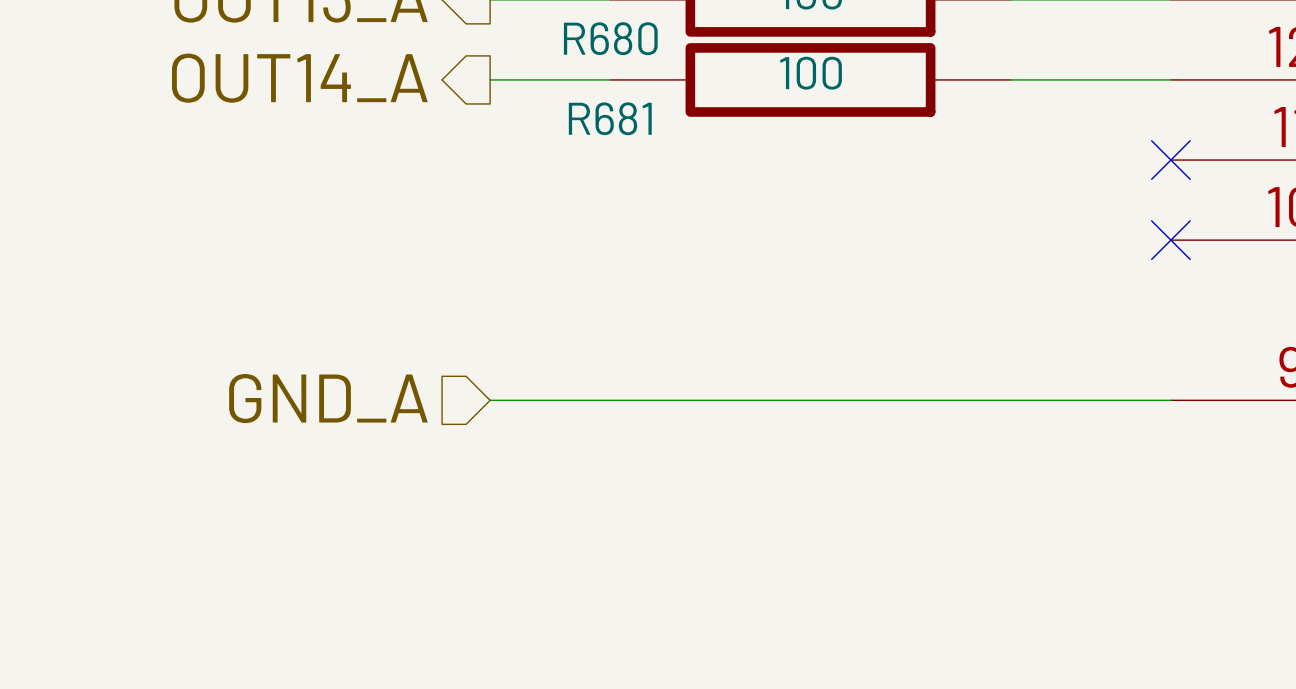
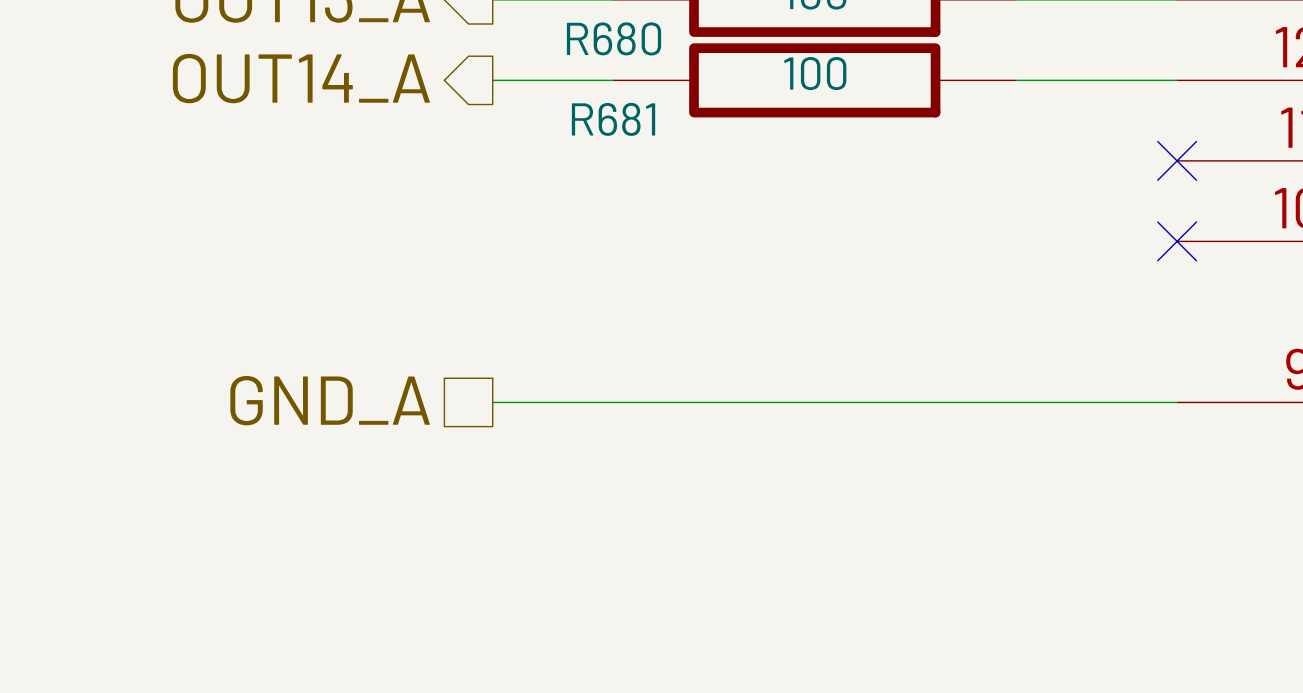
hierarchical label shape: input (328, 398) -> passive (330, 400)

